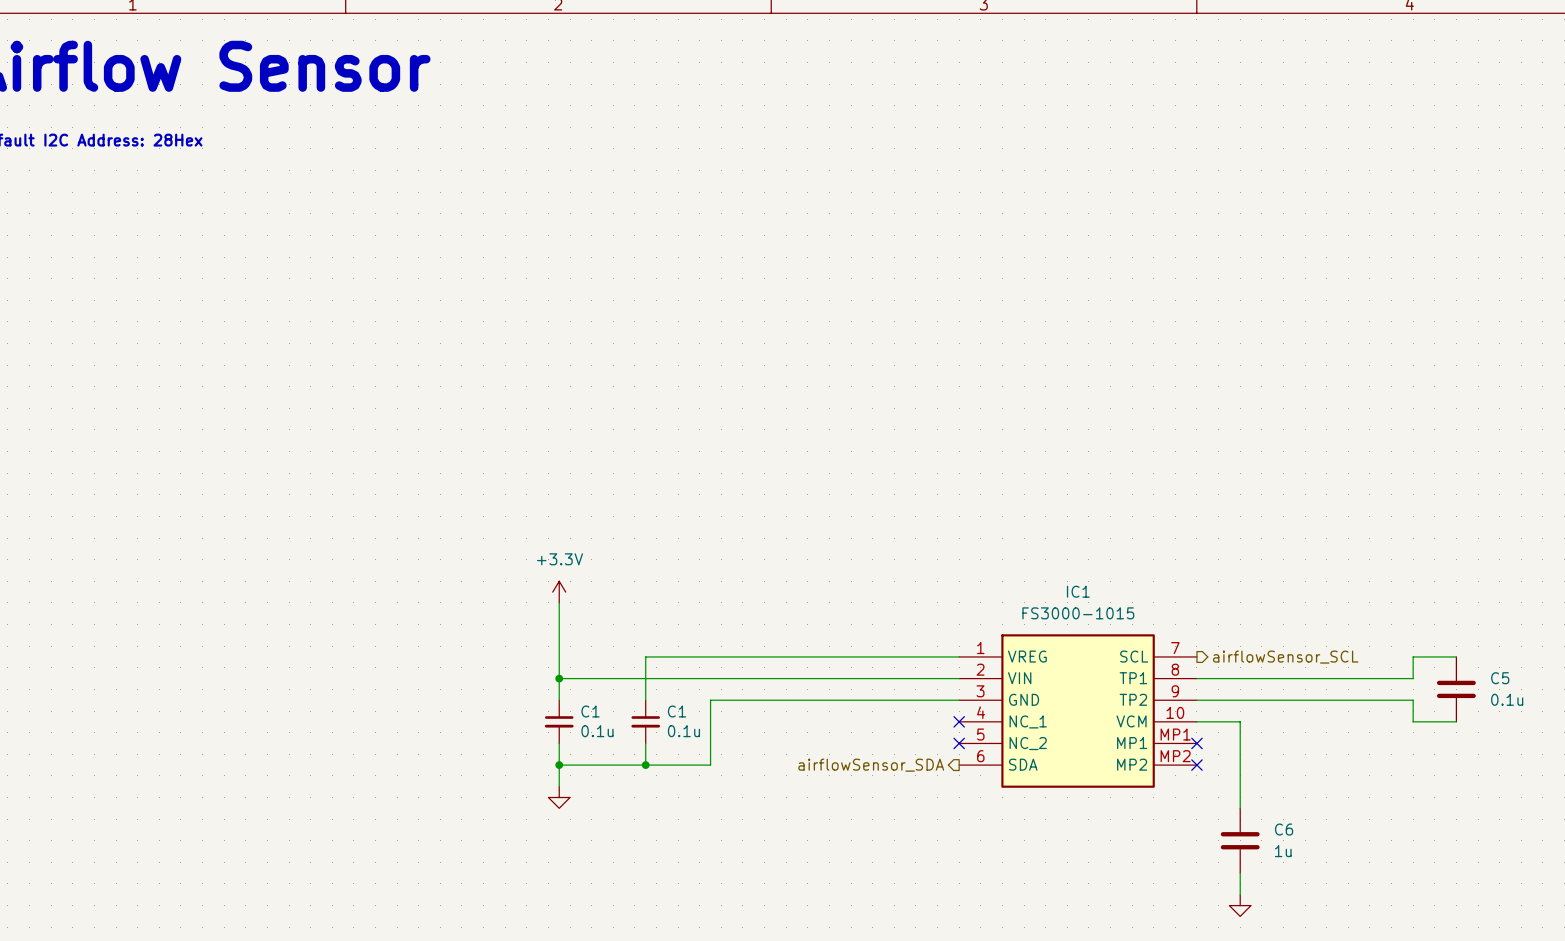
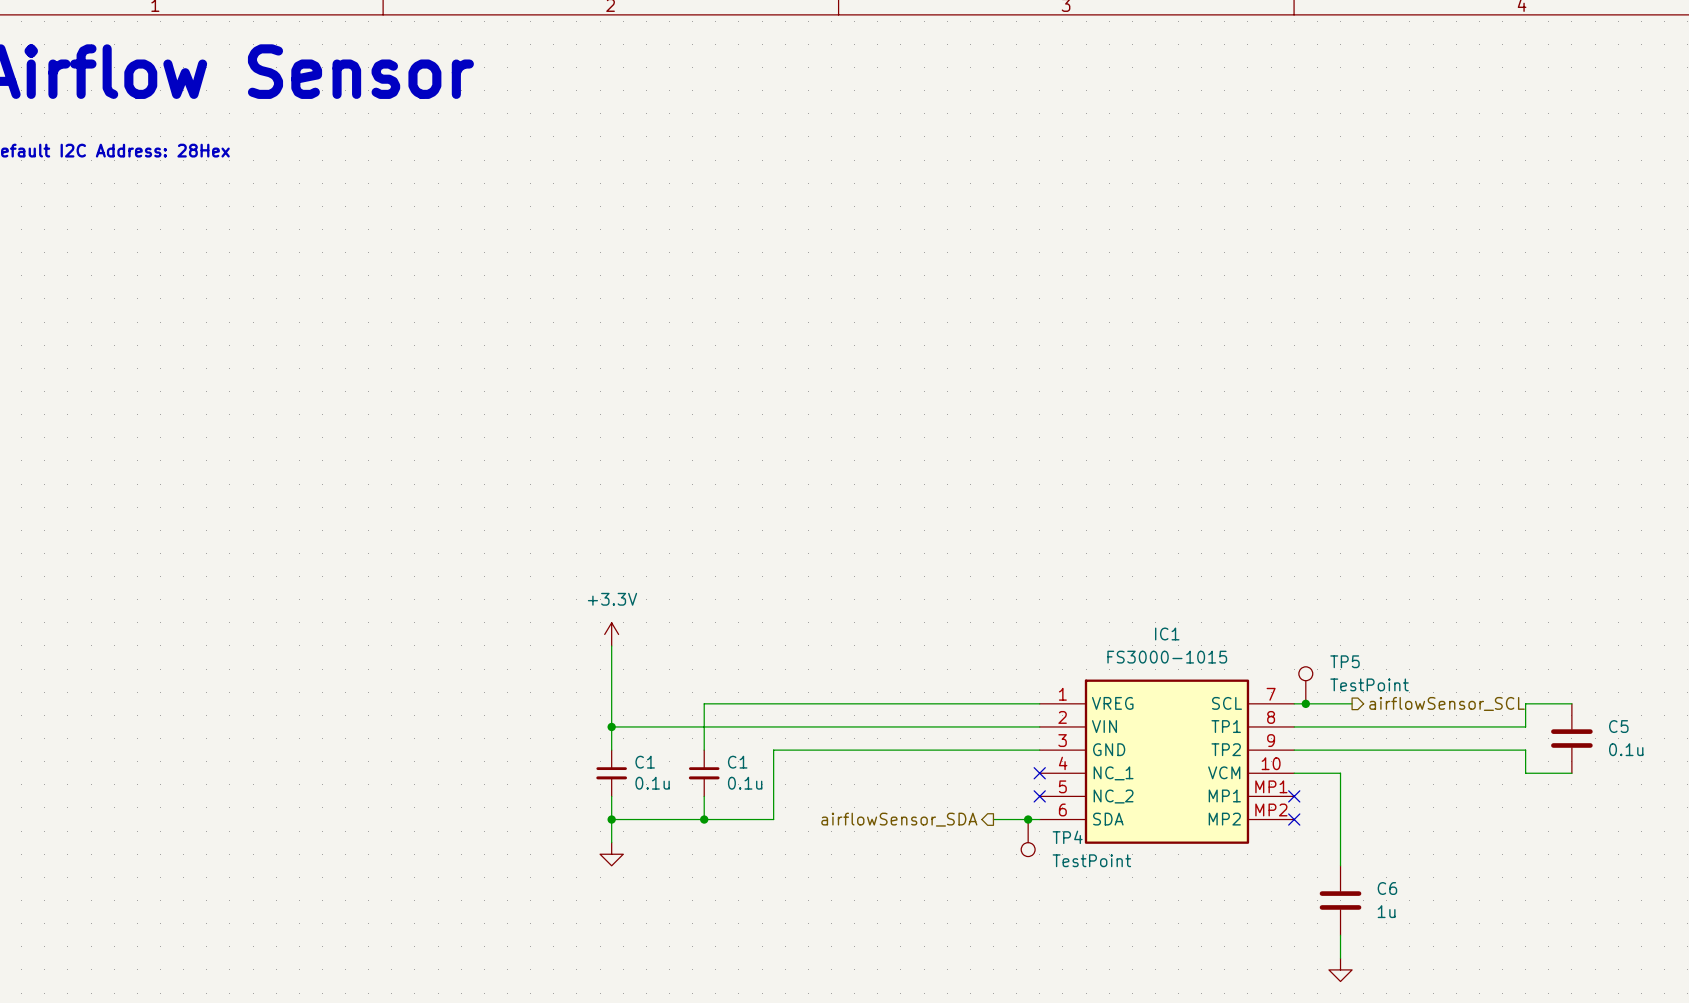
TP5: none -> TestPoint (1305, 685)
wire: none -> (1294, 703) (1352, 703)
junction: none -> (1305, 703)
hierarchical label position: airflowSensor_SCL (1285, 657) -> airflowSensor_SCL (1447, 703)
hierarchical label position: airflowSensor_SDA (871, 765) -> airflowSensor_SDA (899, 819)
wire: none -> (993, 819) (1039, 819)
junction: none -> (1028, 819)
TP4: none -> TestPoint (1028, 838)

